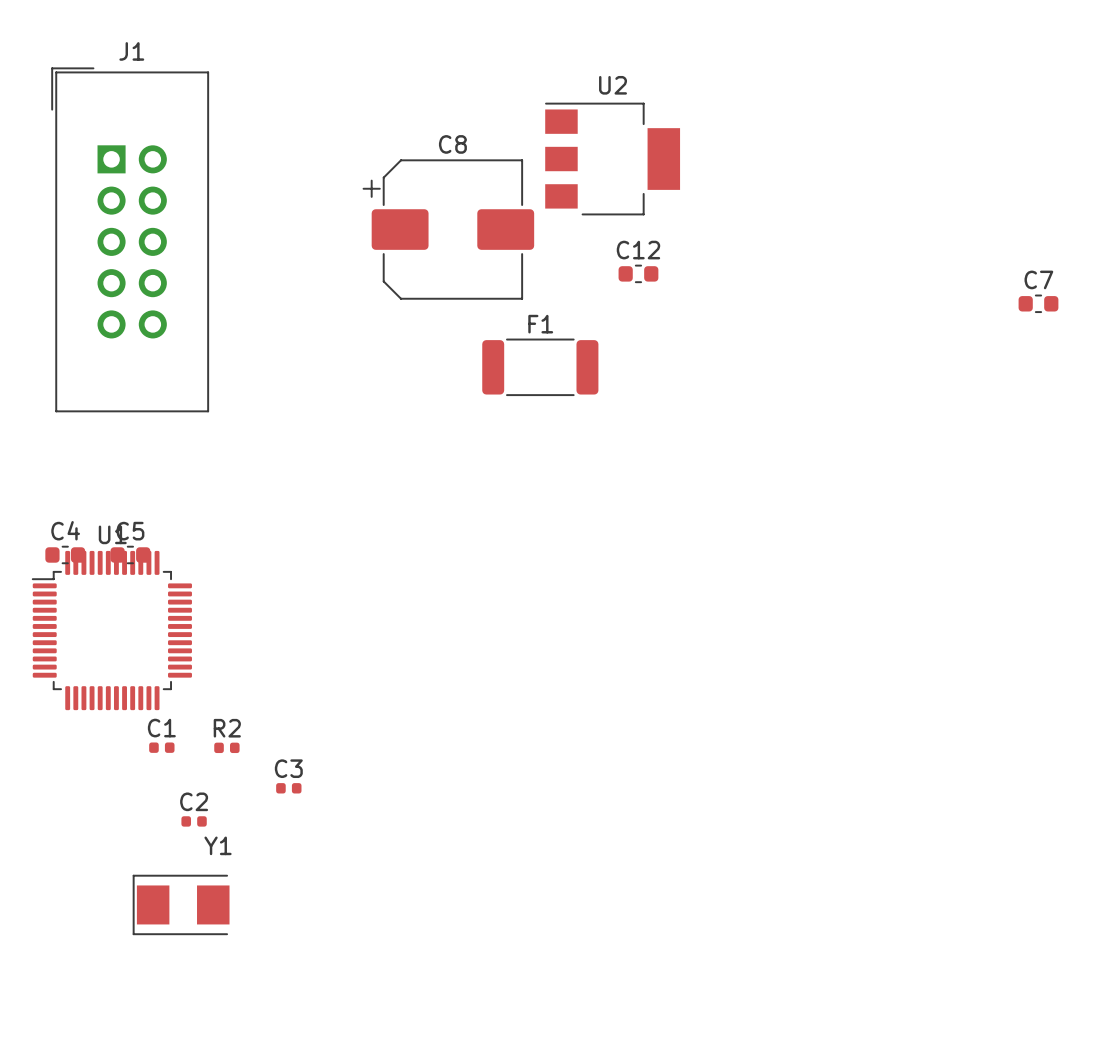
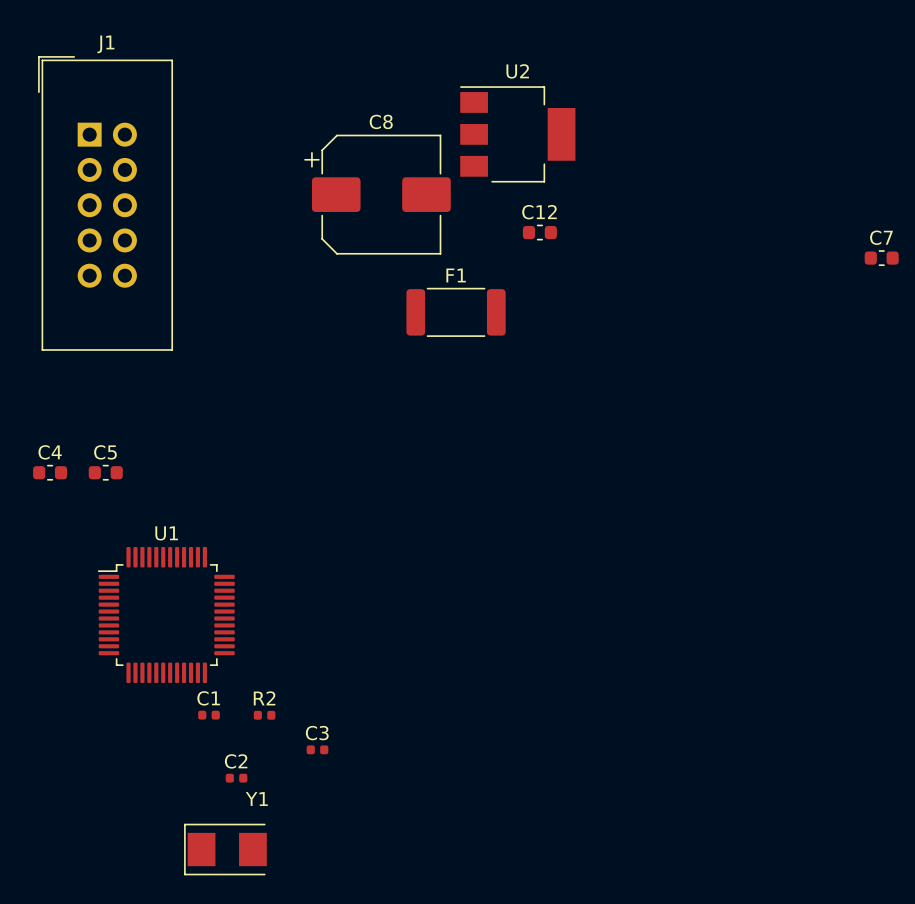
U1 position: (111, 630) -> (166, 615)
C1 position: (161, 747) -> (208, 715)
R2 position: (226, 747) -> (264, 715)
C3 position: (288, 788) -> (317, 749)
C2 position: (194, 821) -> (236, 778)
Y1 position: (181, 904) -> (225, 849)

